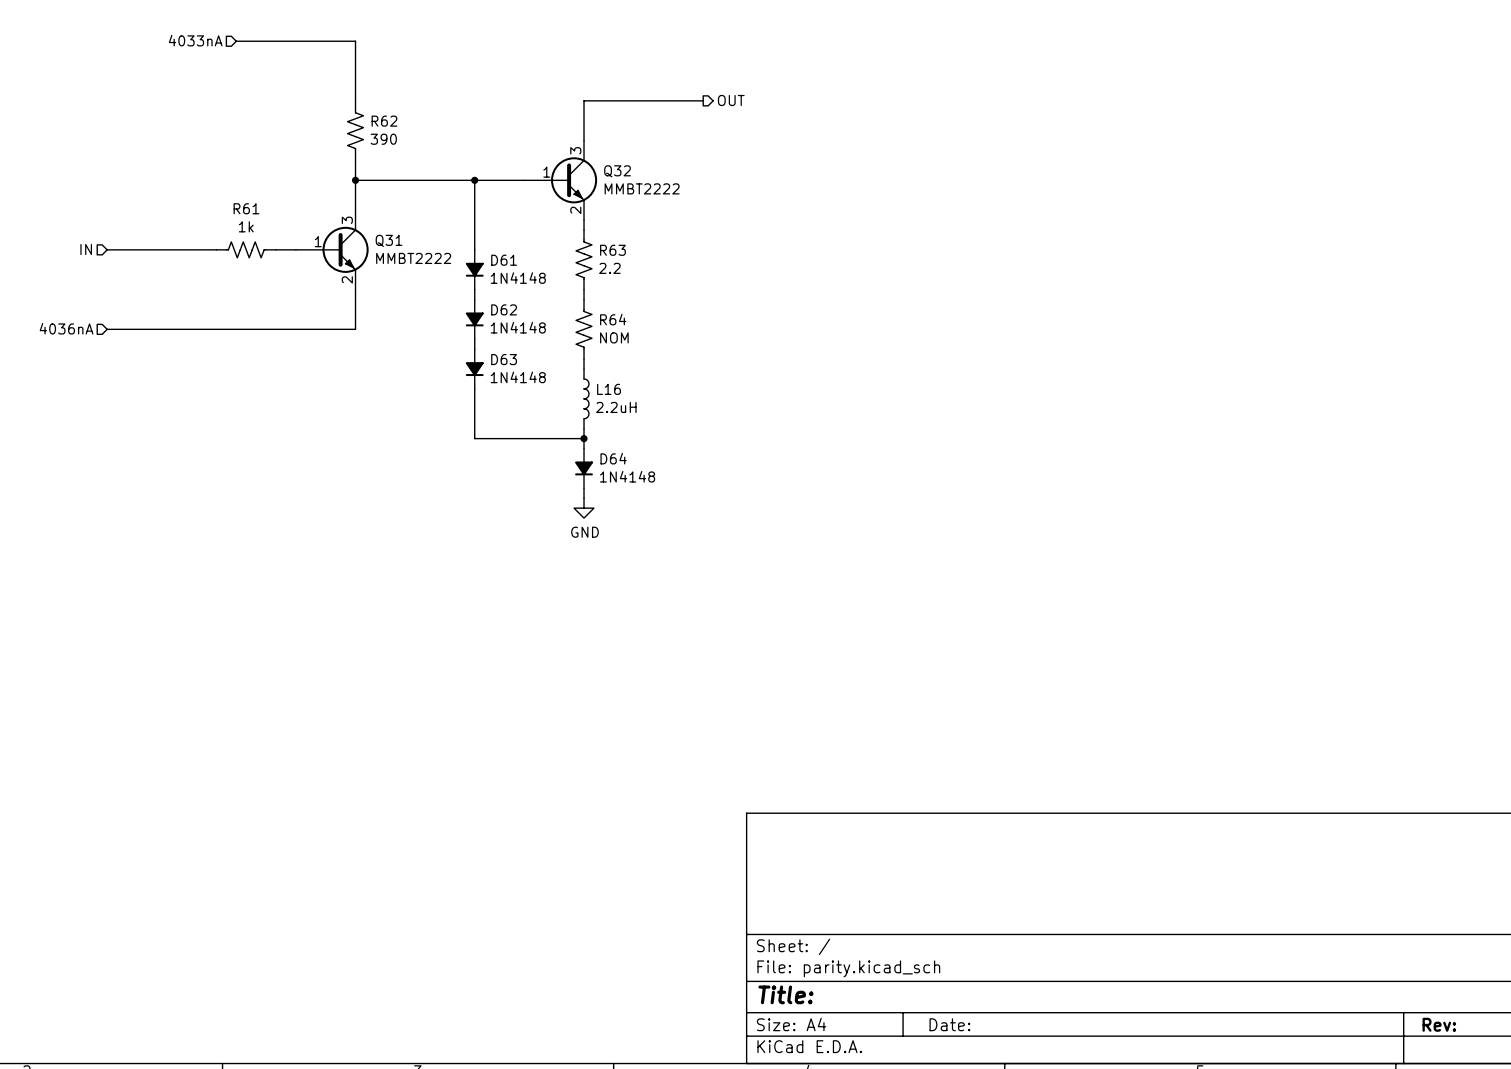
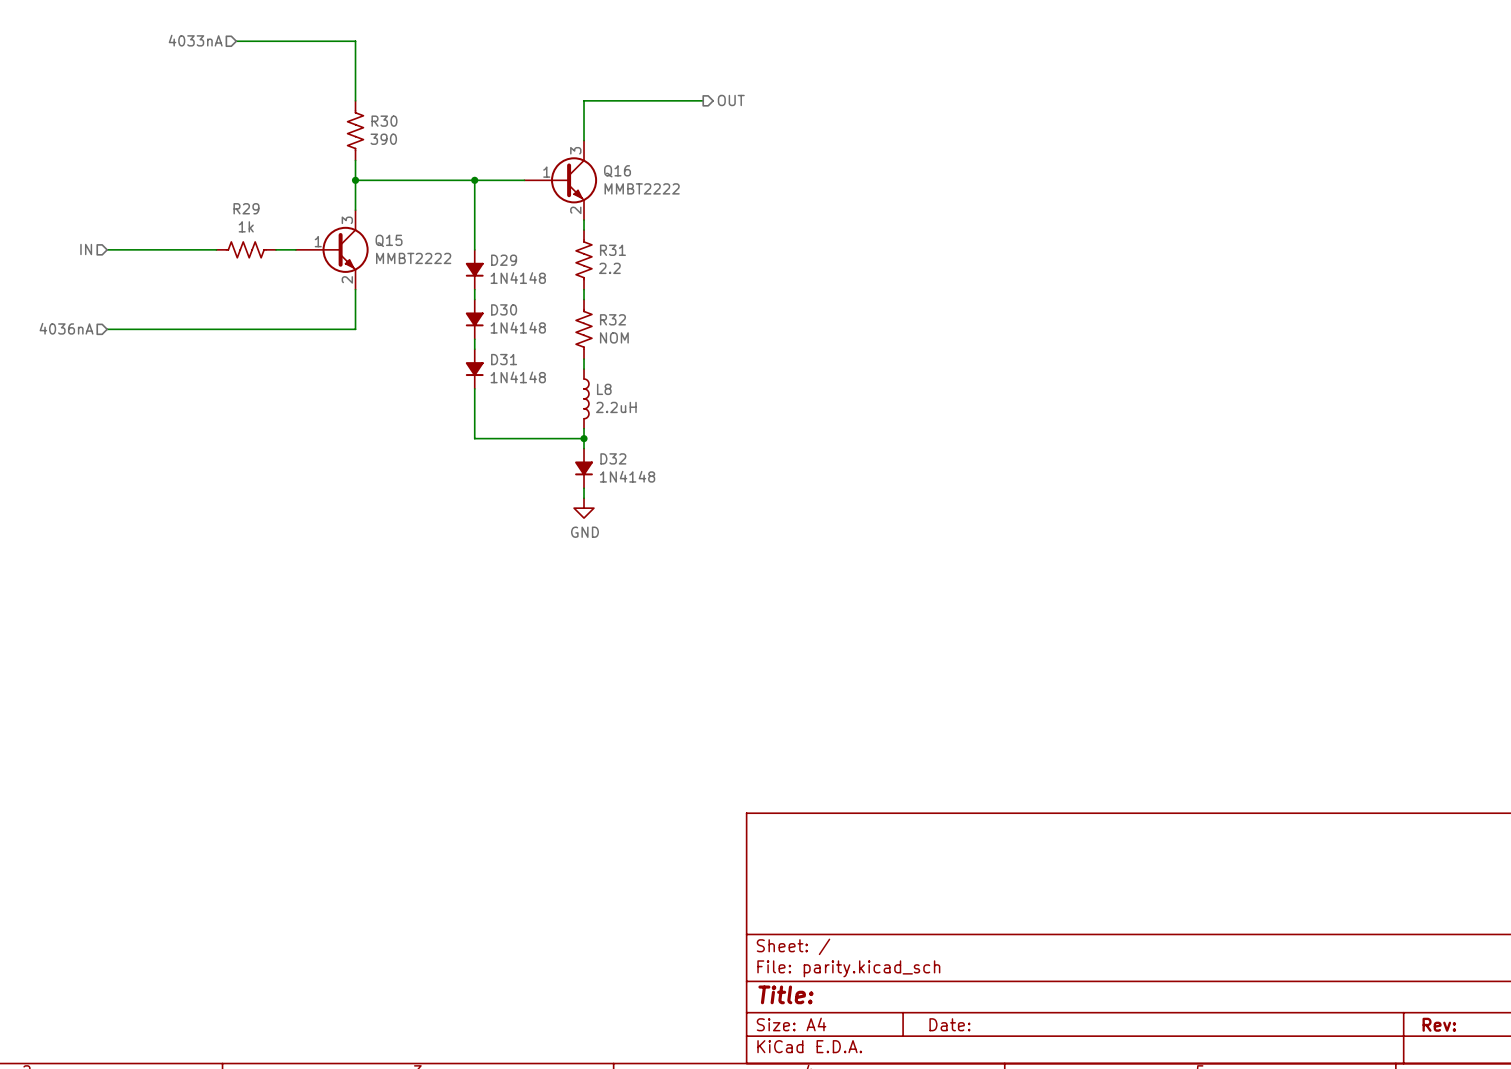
R62 name: R62 (384, 121) -> R30 (384, 121)
Q32 name: Q32 (617, 171) -> Q16 (617, 171)
R61 name: R61 (246, 208) -> R29 (246, 208)
Q31 name: Q31 (389, 240) -> Q15 (389, 240)
R63 name: R63 (612, 250) -> R31 (612, 250)
D61 name: D61 (504, 260) -> D29 (504, 260)
D62 name: D62 (504, 309) -> D30 (504, 309)
R64 name: R64 (613, 319) -> R32 (612, 319)
D63 name: D63 (504, 359) -> D31 (504, 359)
L16 name: L16 (609, 389) -> L8 (604, 389)
D64 name: D64 (613, 458) -> D32 (613, 458)

